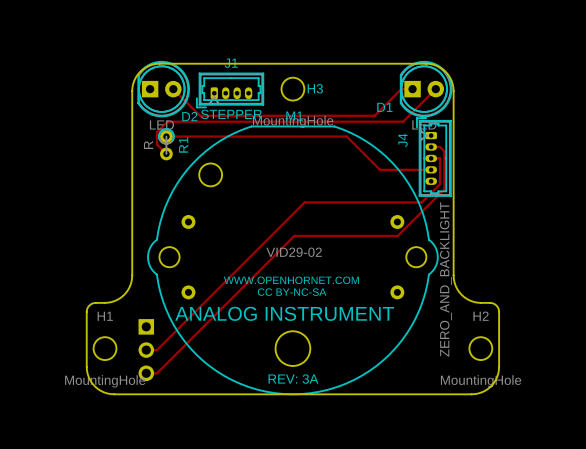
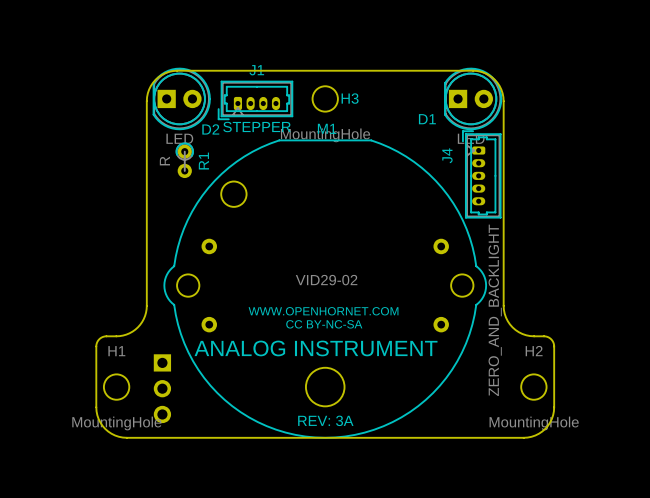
track: (173, 89) (199, 115) (374, 115) (401, 89) (412, 89) -> none
track: (435, 89) (403, 121) (167, 121) (157, 132) (157, 144) (166, 153) -> none
track: (166, 136) (346, 136) (380, 169) (431, 169) -> none
track: (431, 146) (440, 146) (444, 151) (444, 189) (397, 235) (294, 235) (157, 373) (146, 373) -> none
track: (431, 158) (440, 158) (440, 184) (421, 202) (304, 202) (157, 350) (146, 350) -> none

